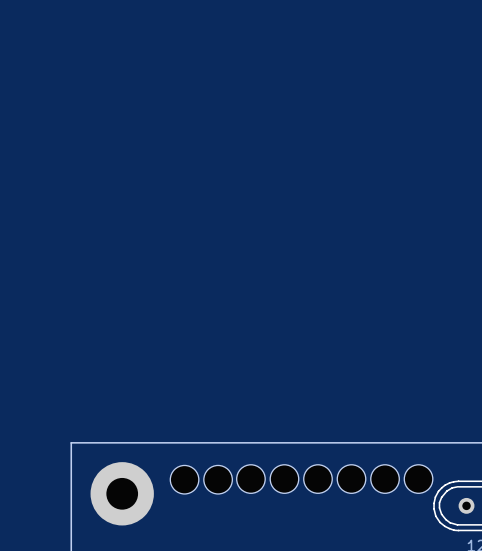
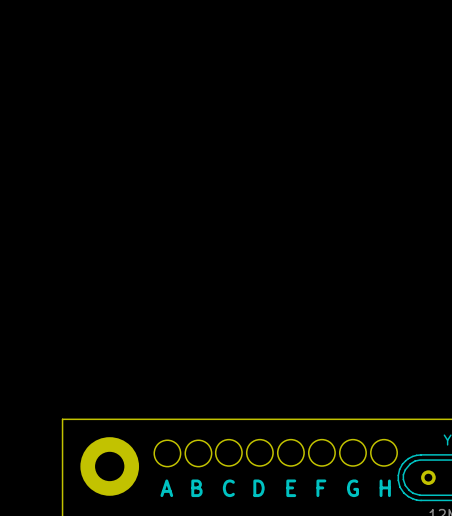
text: none -> A (166, 488)
text: none -> B (196, 488)
text: none -> C (228, 488)
text: none -> D (259, 488)
text: none -> E (291, 488)
text: none -> F (321, 488)
text: none -> G (352, 488)
text: none -> H (385, 488)

